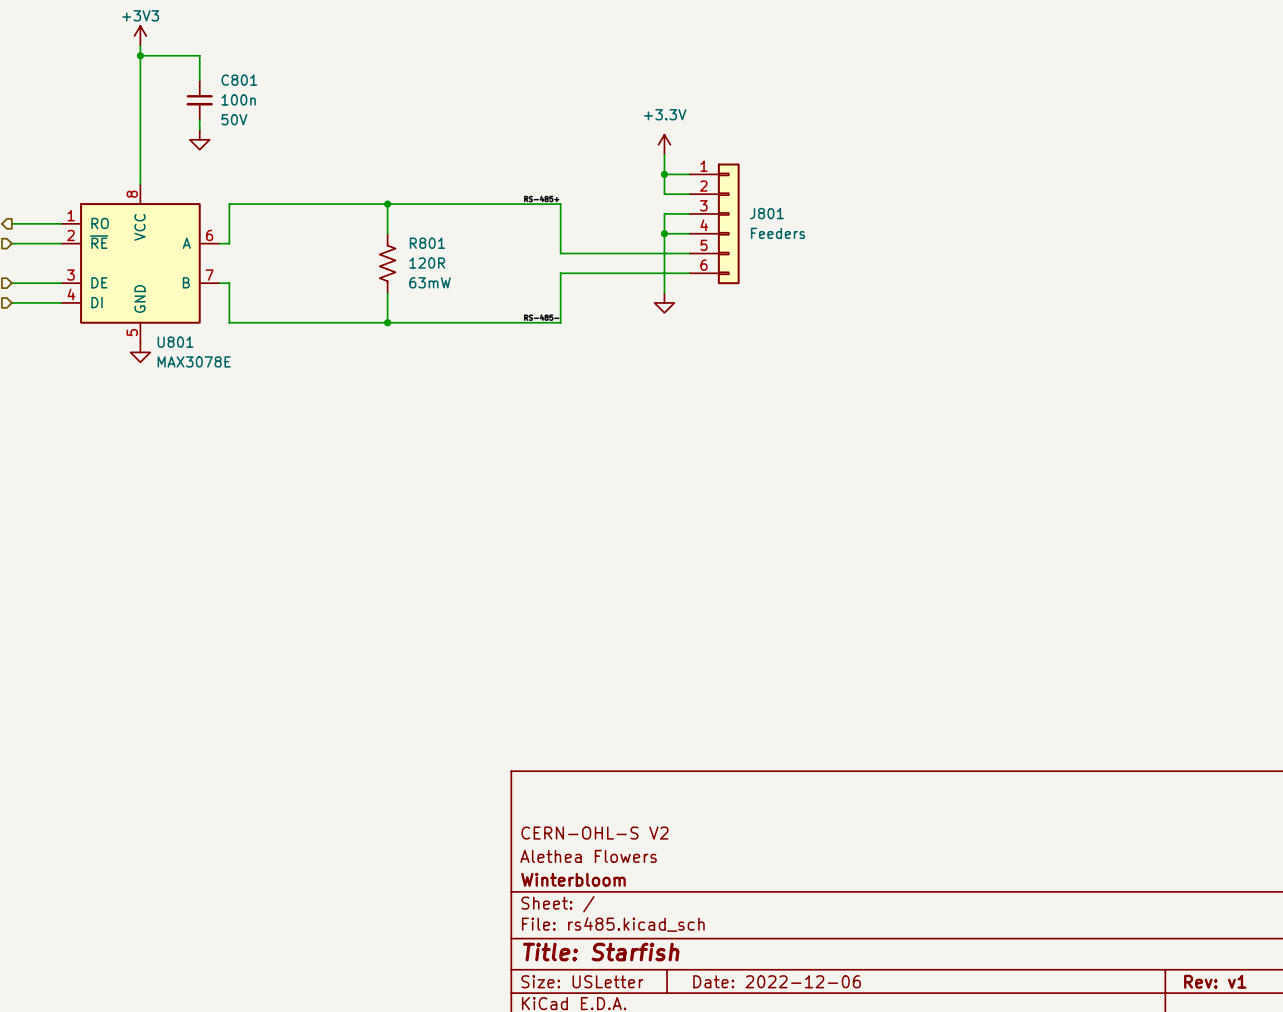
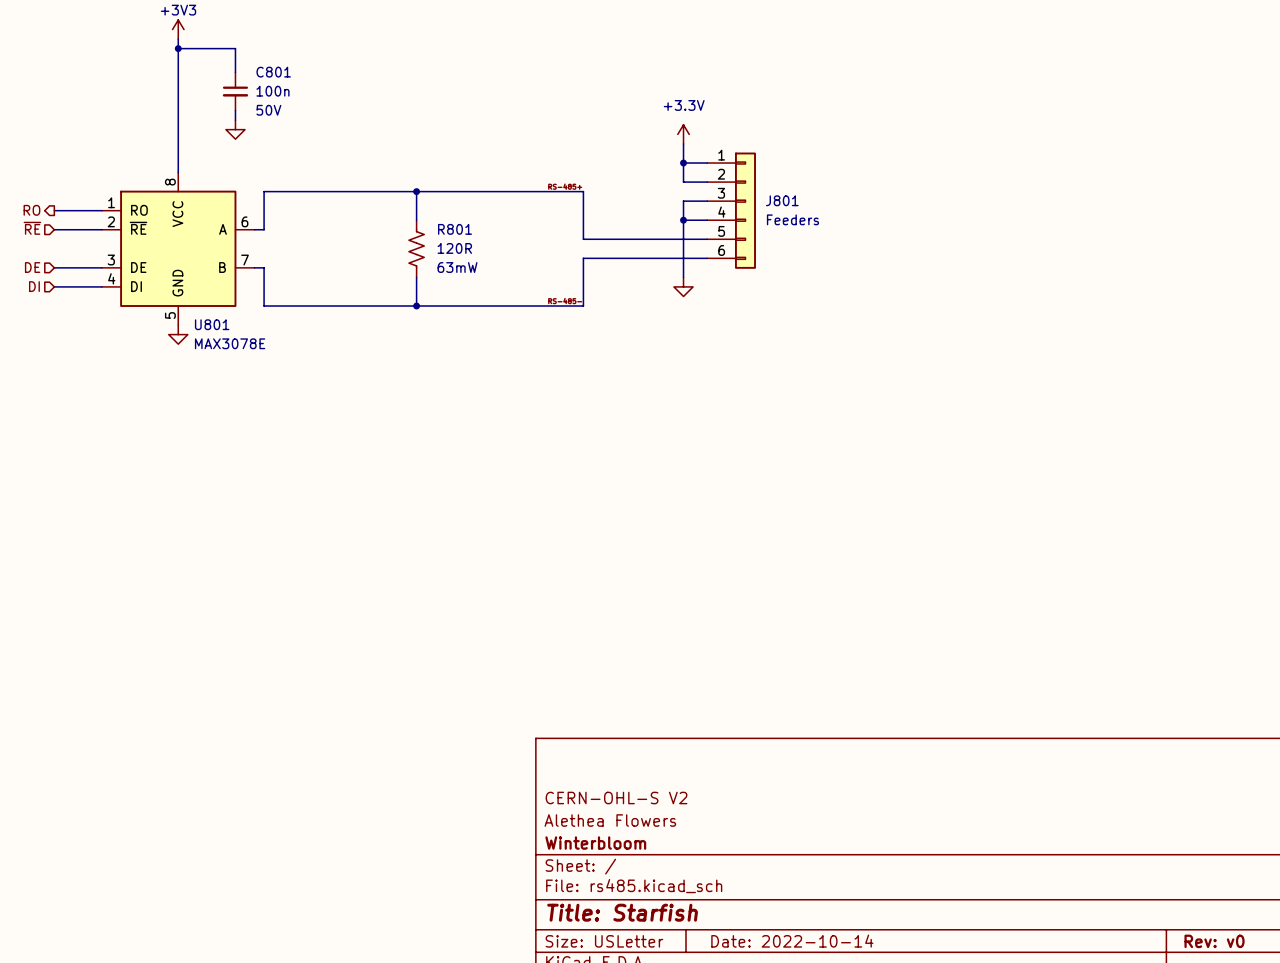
title block: Date: 2022-12-06 (777, 981) -> Date: 2022-10-14 (792, 941)
title block: Rev: v1 (1215, 981) -> Rev: v0 (1214, 941)

